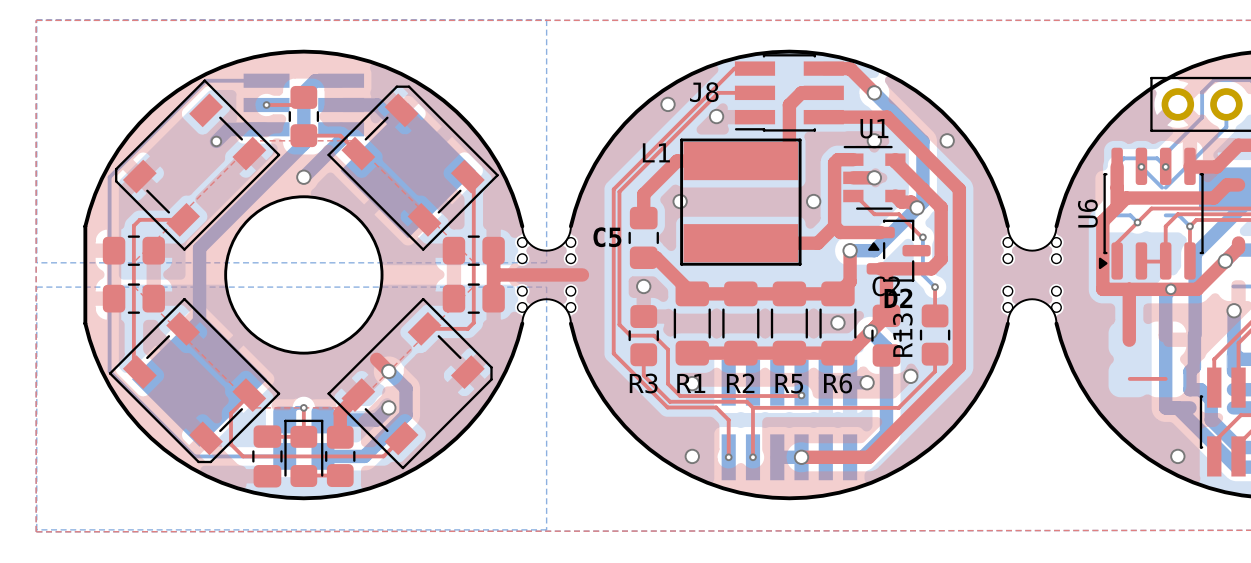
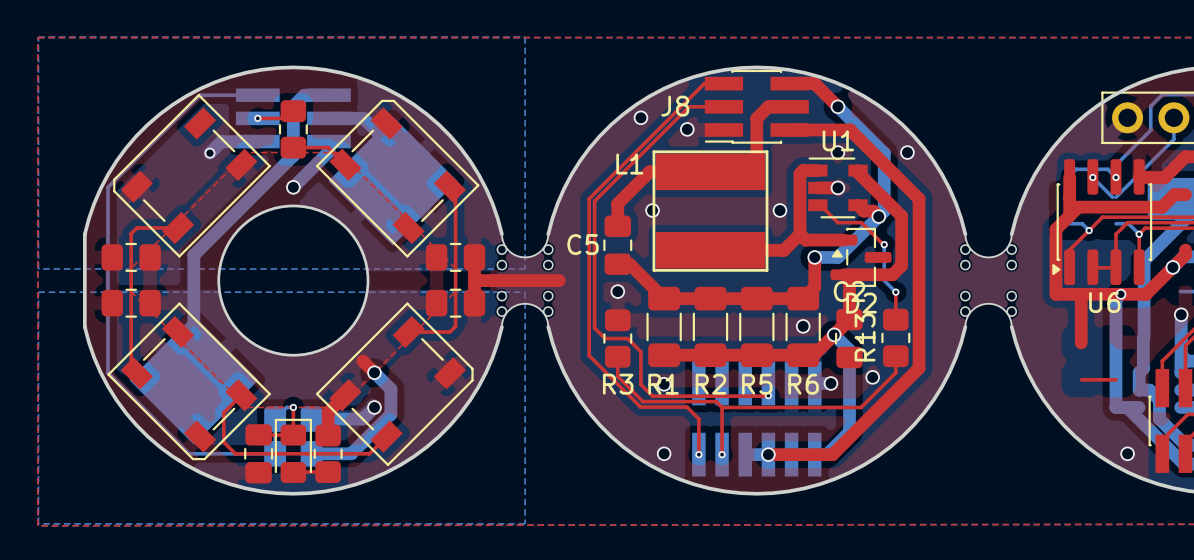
U6 name rotation: 0° (1087, 213) -> 90° clockwise (1104, 302)
U6 name position: U6 (1087, 213) -> U6 (1104, 302)

